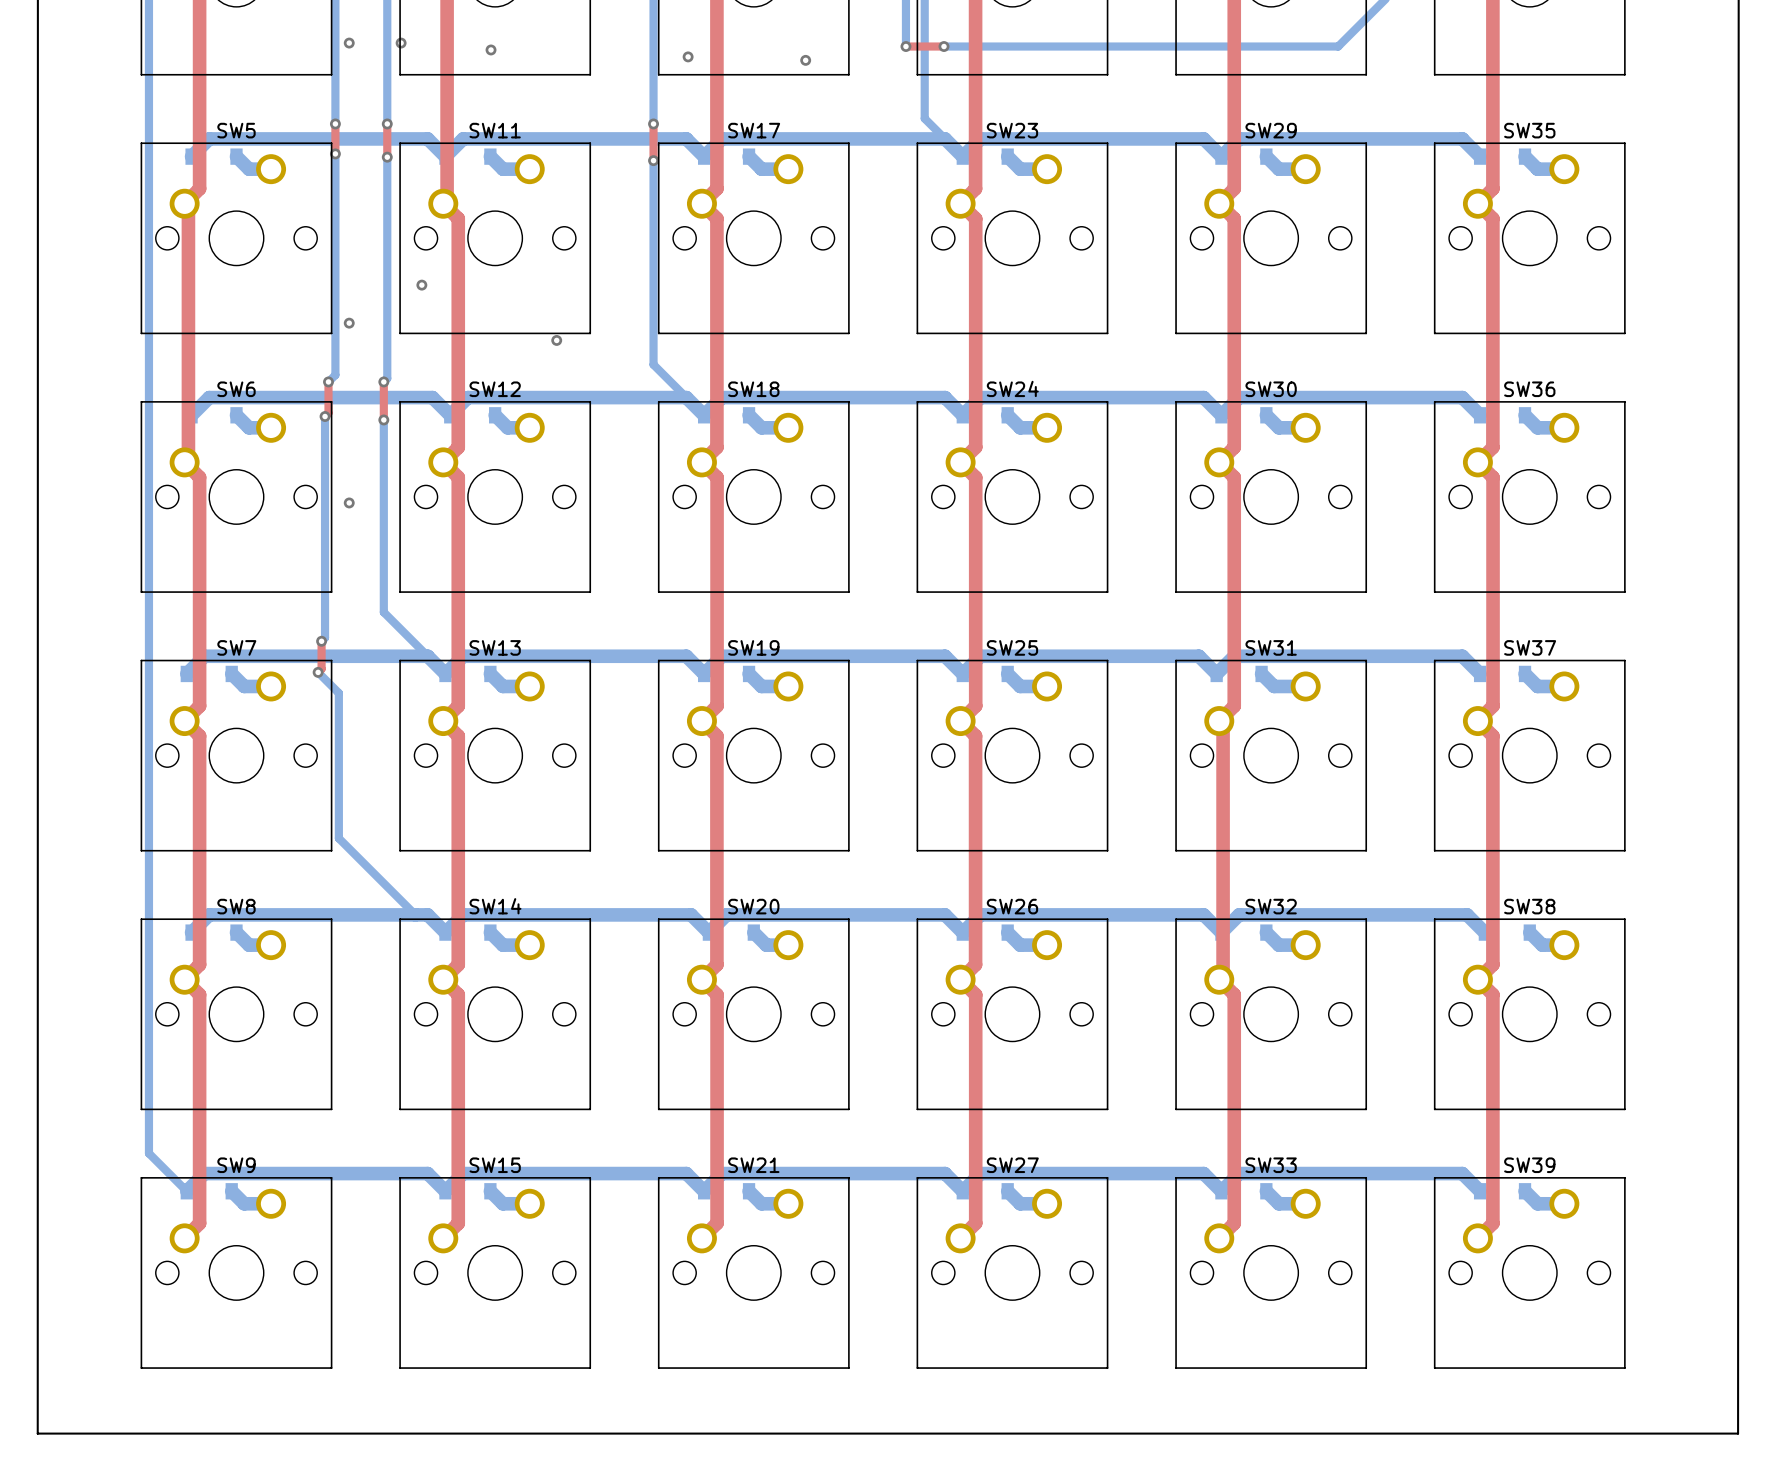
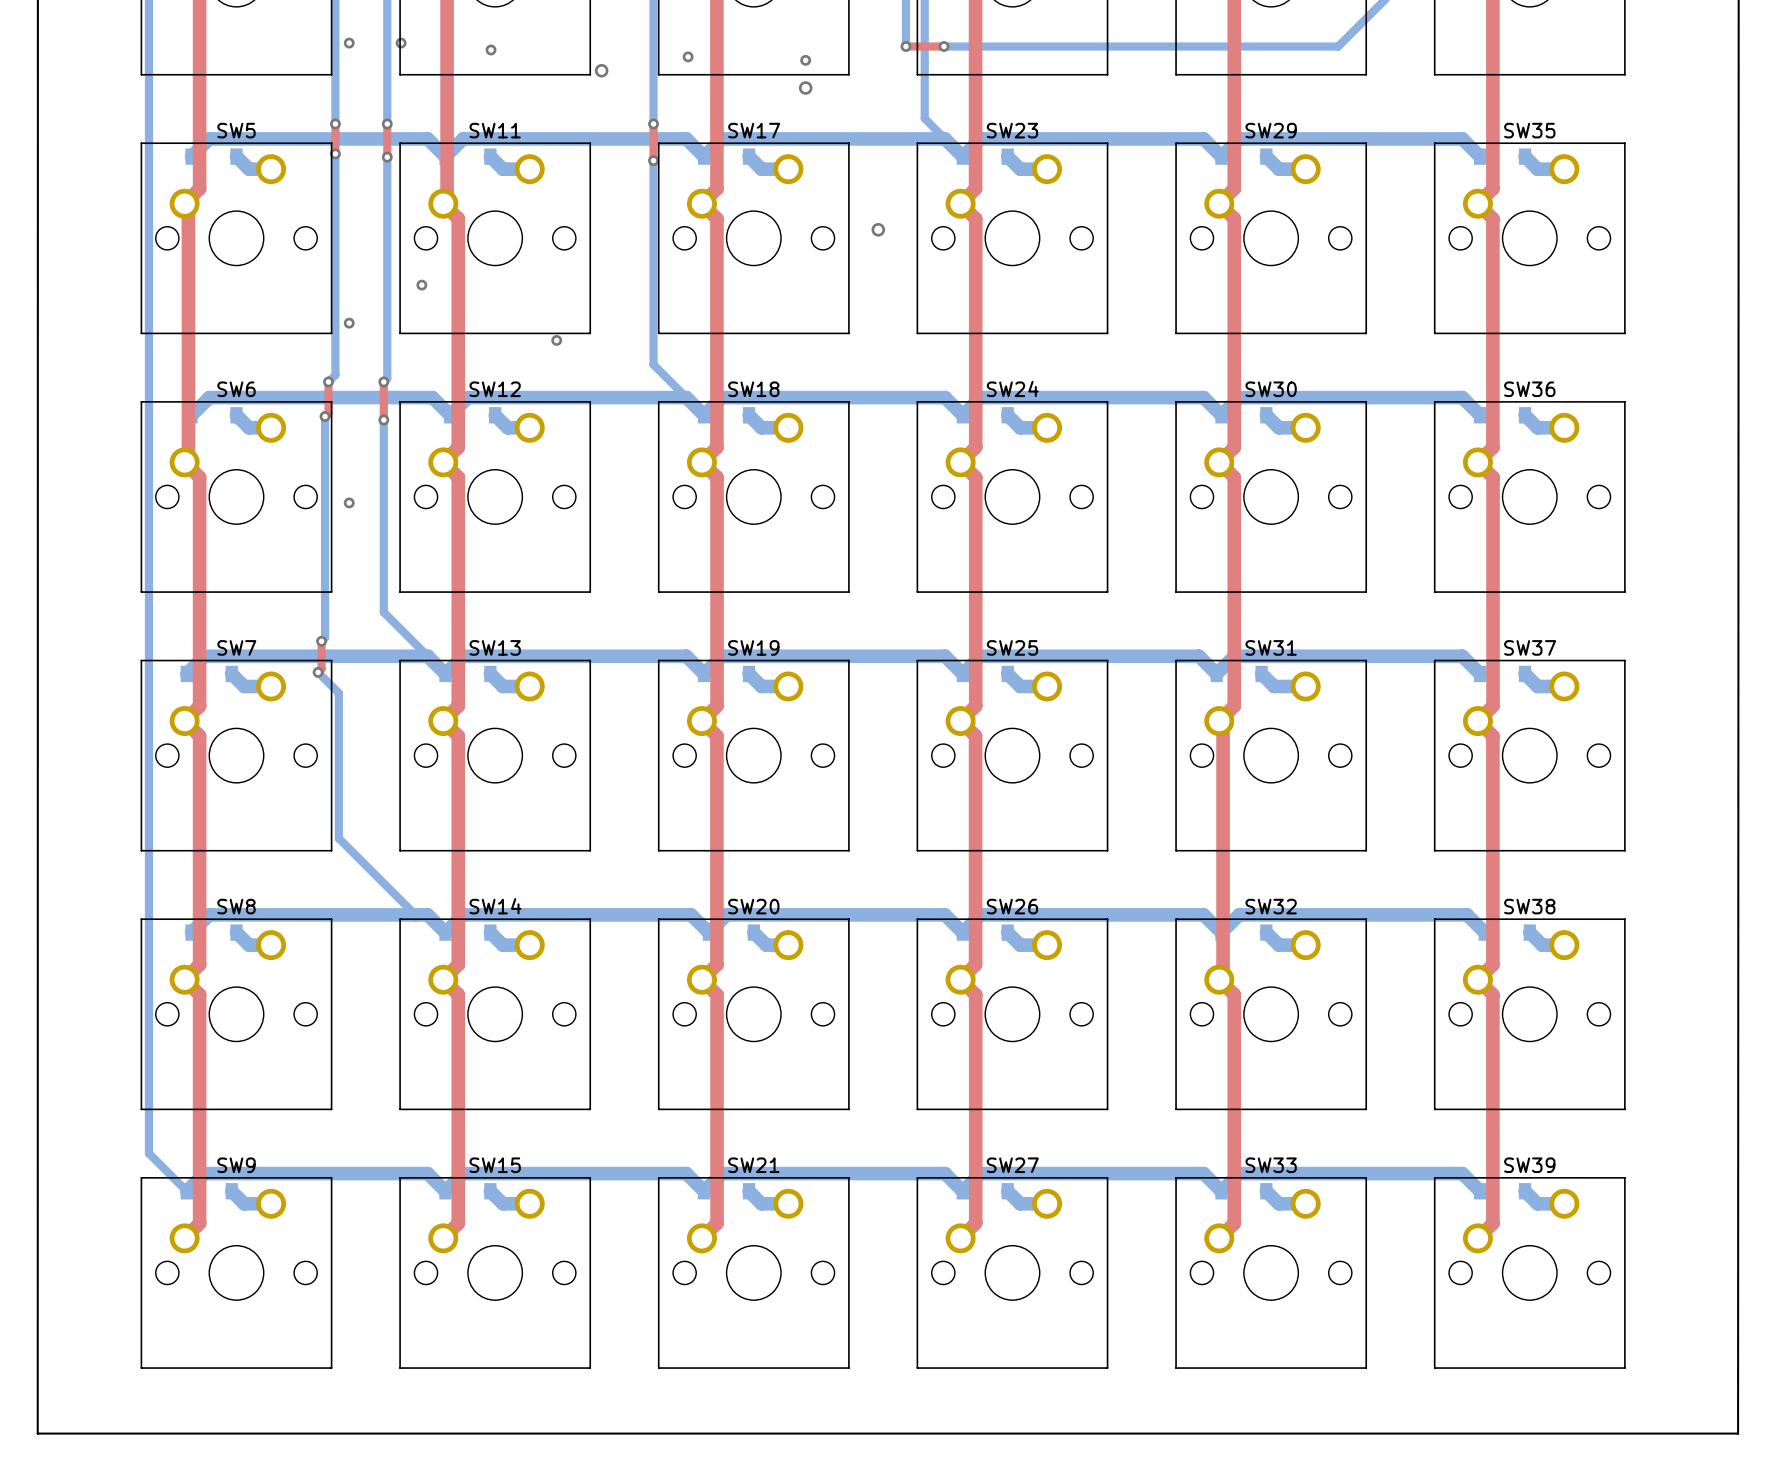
via: none -> (601, 70)
via: none -> (805, 88)
via: none -> (878, 229)

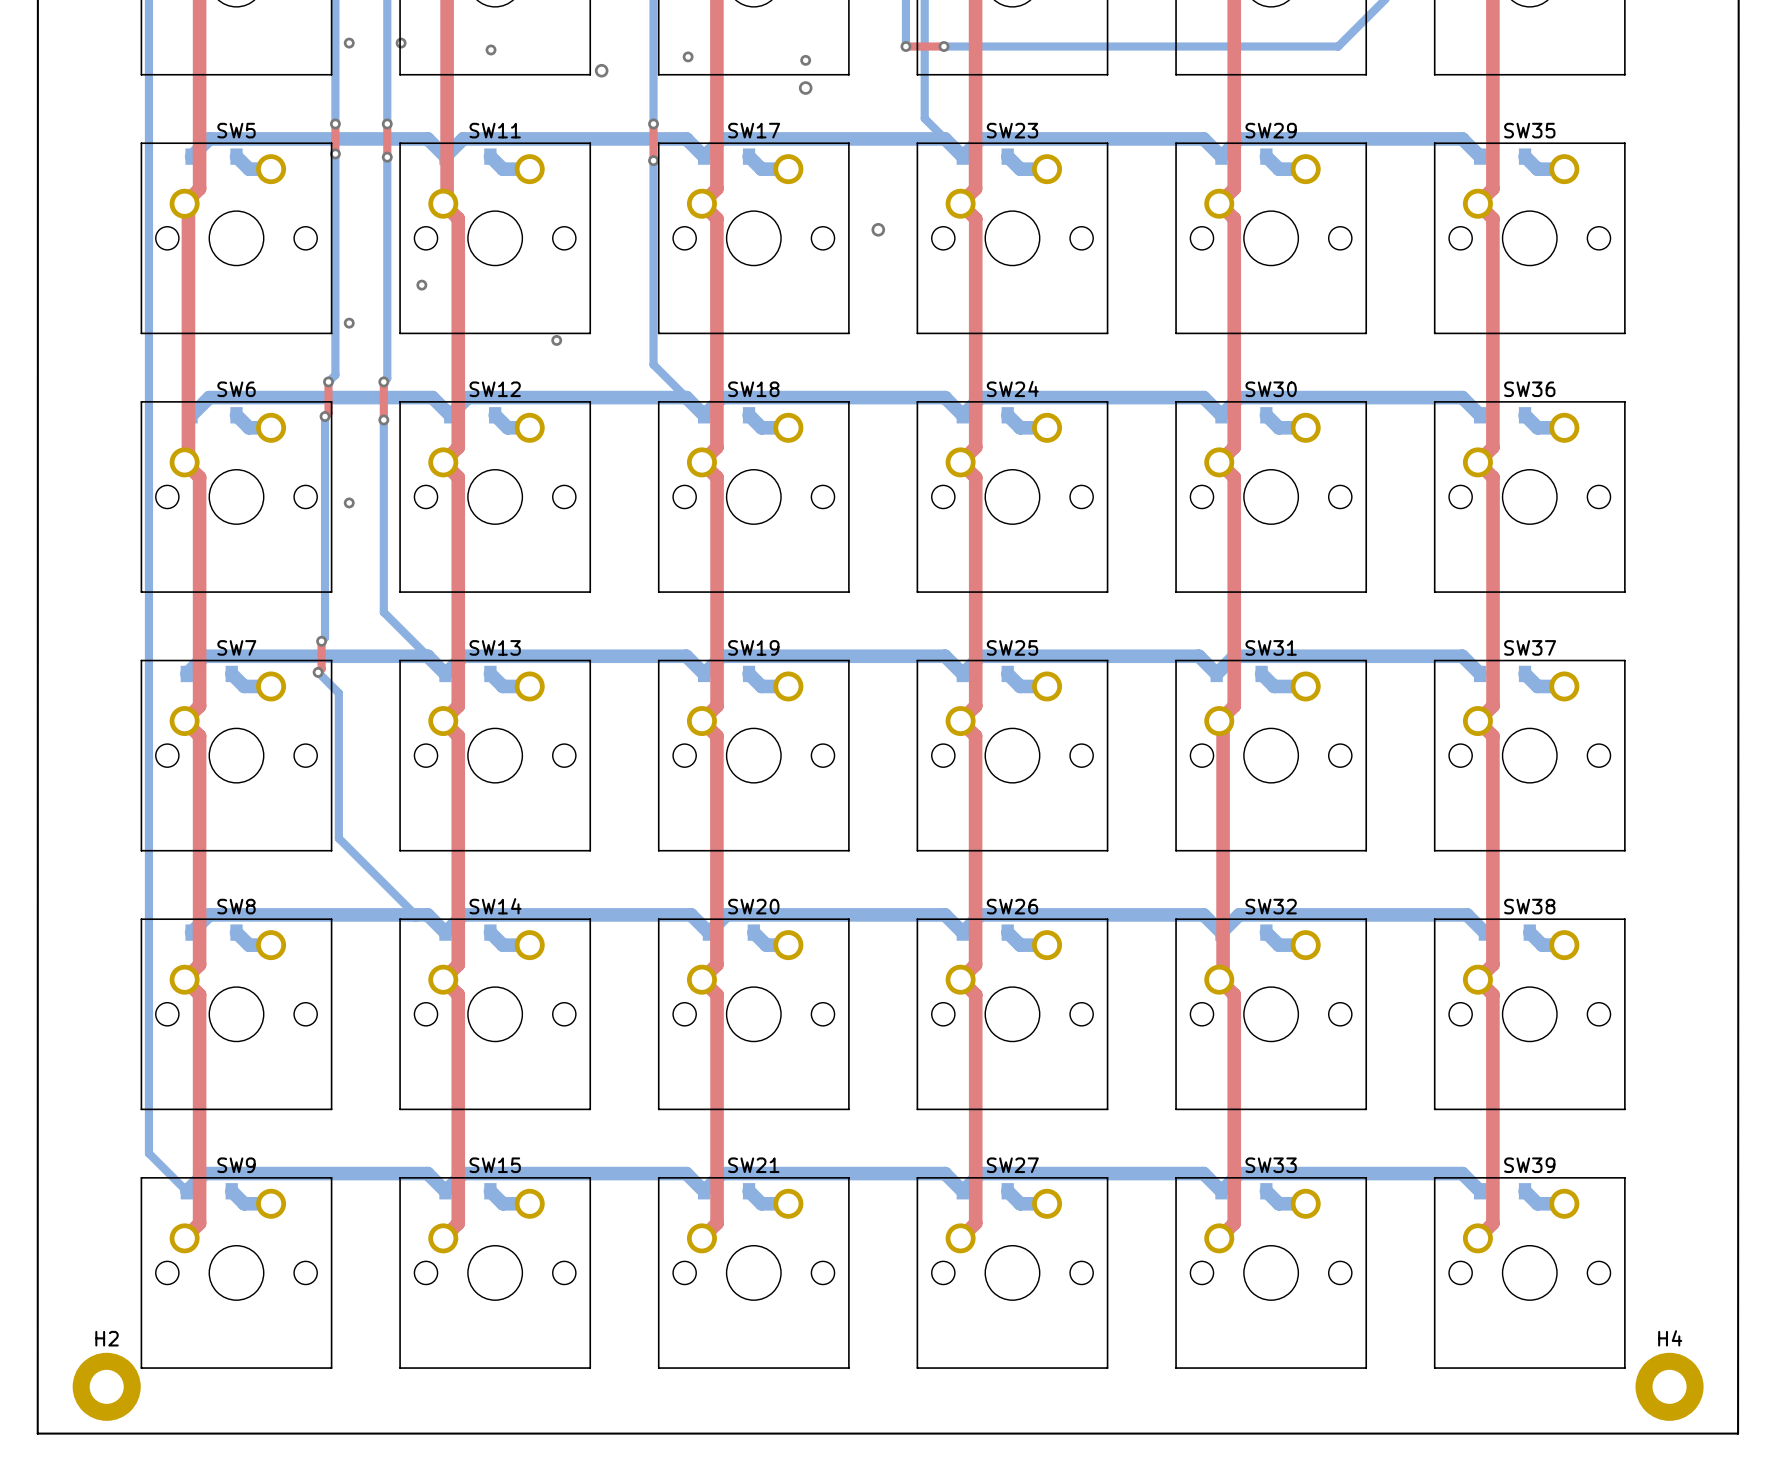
H2: none -> (106, 1386)
H4: none -> (1669, 1386)

